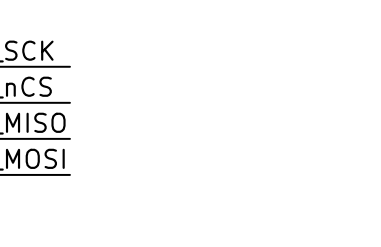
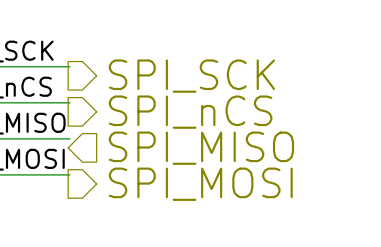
hierarchical label: none -> SPI_SCK (191, 76)
hierarchical label: none -> SPI_nCS (190, 112)
hierarchical label: none -> SPI_MISO (201, 148)
hierarchical label: none -> SPI_MOSI (200, 184)

